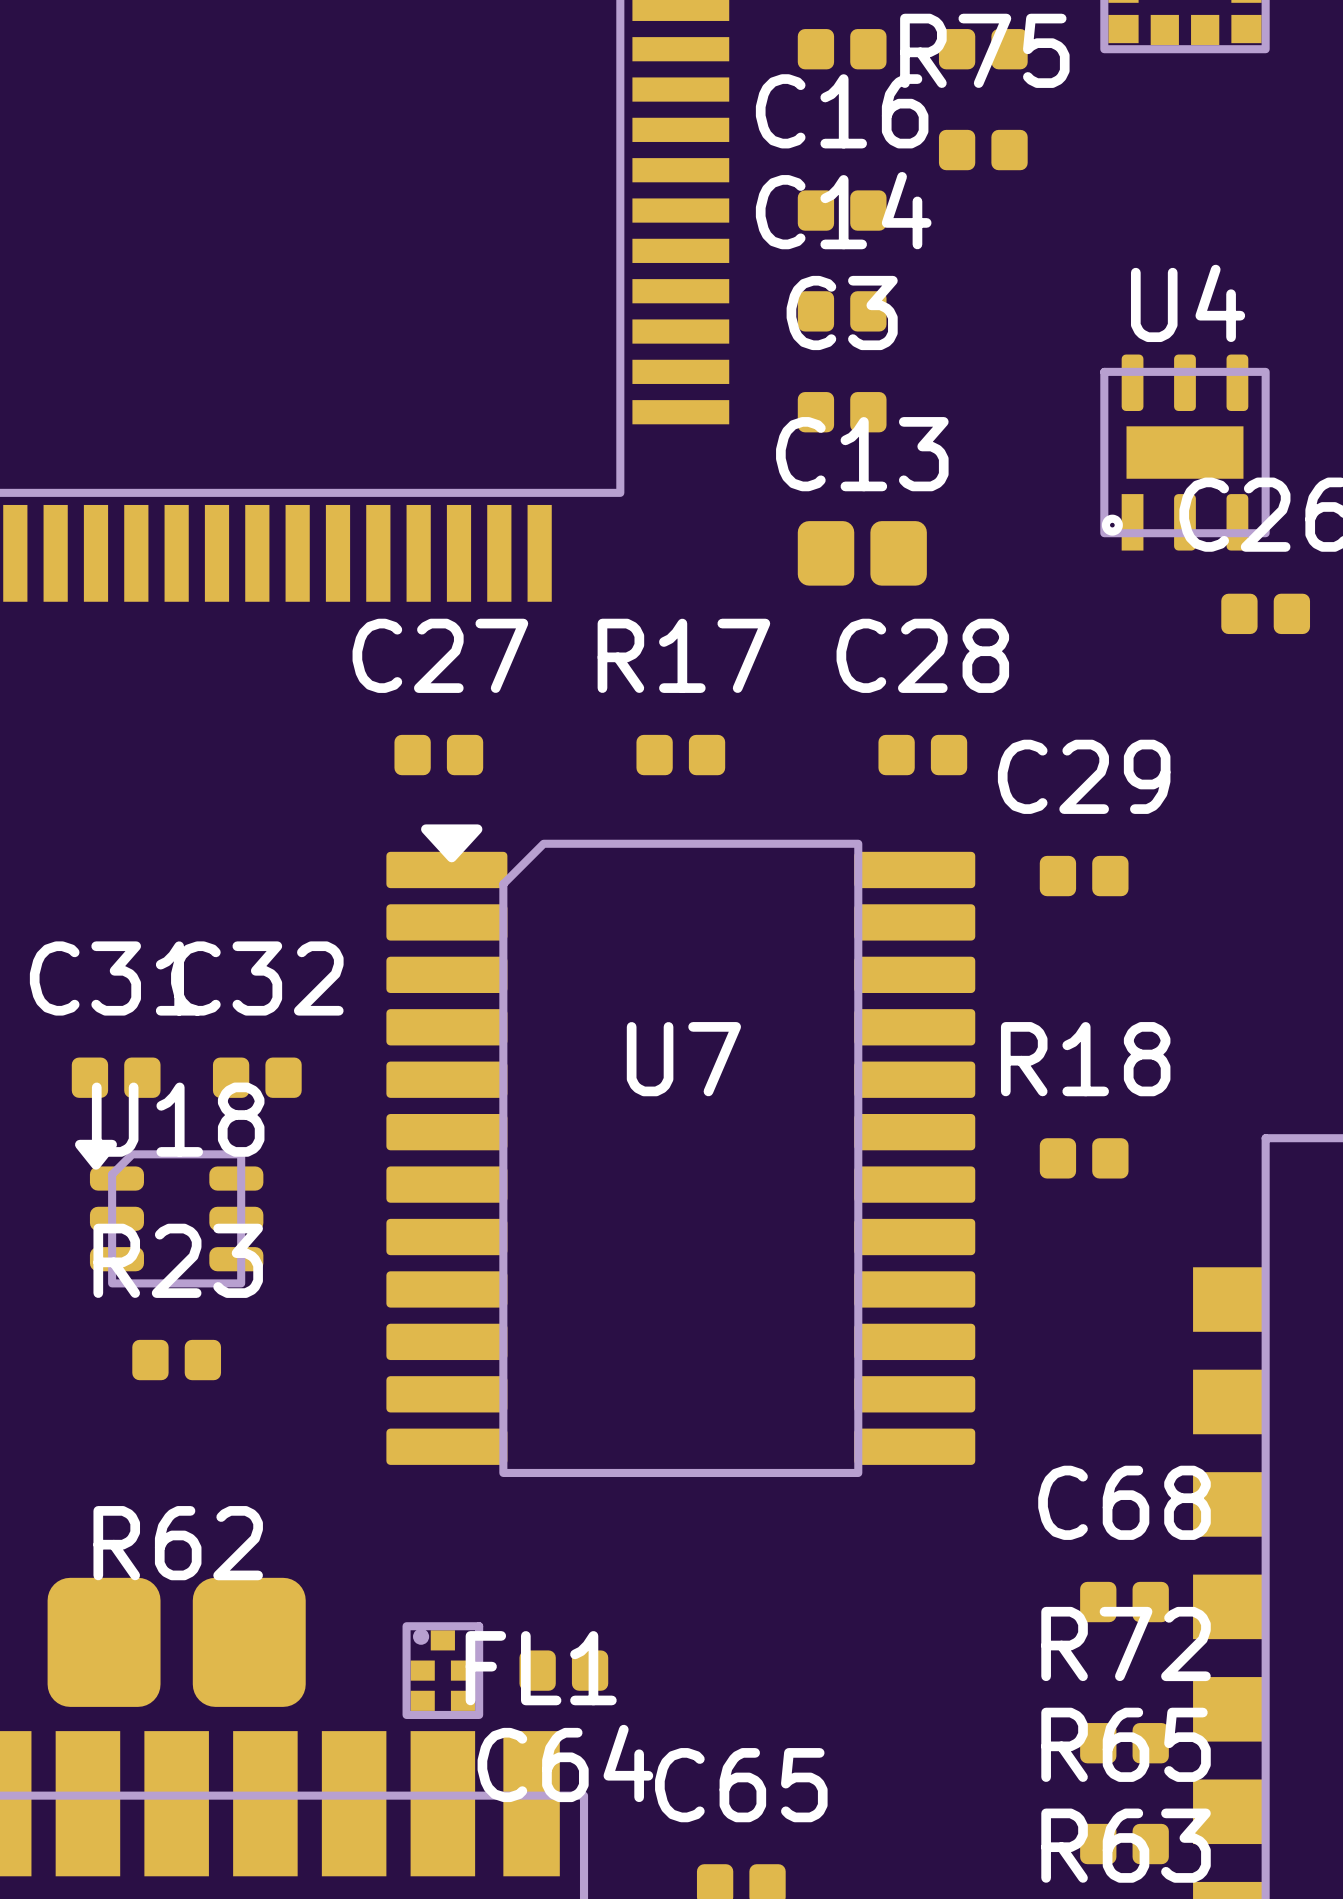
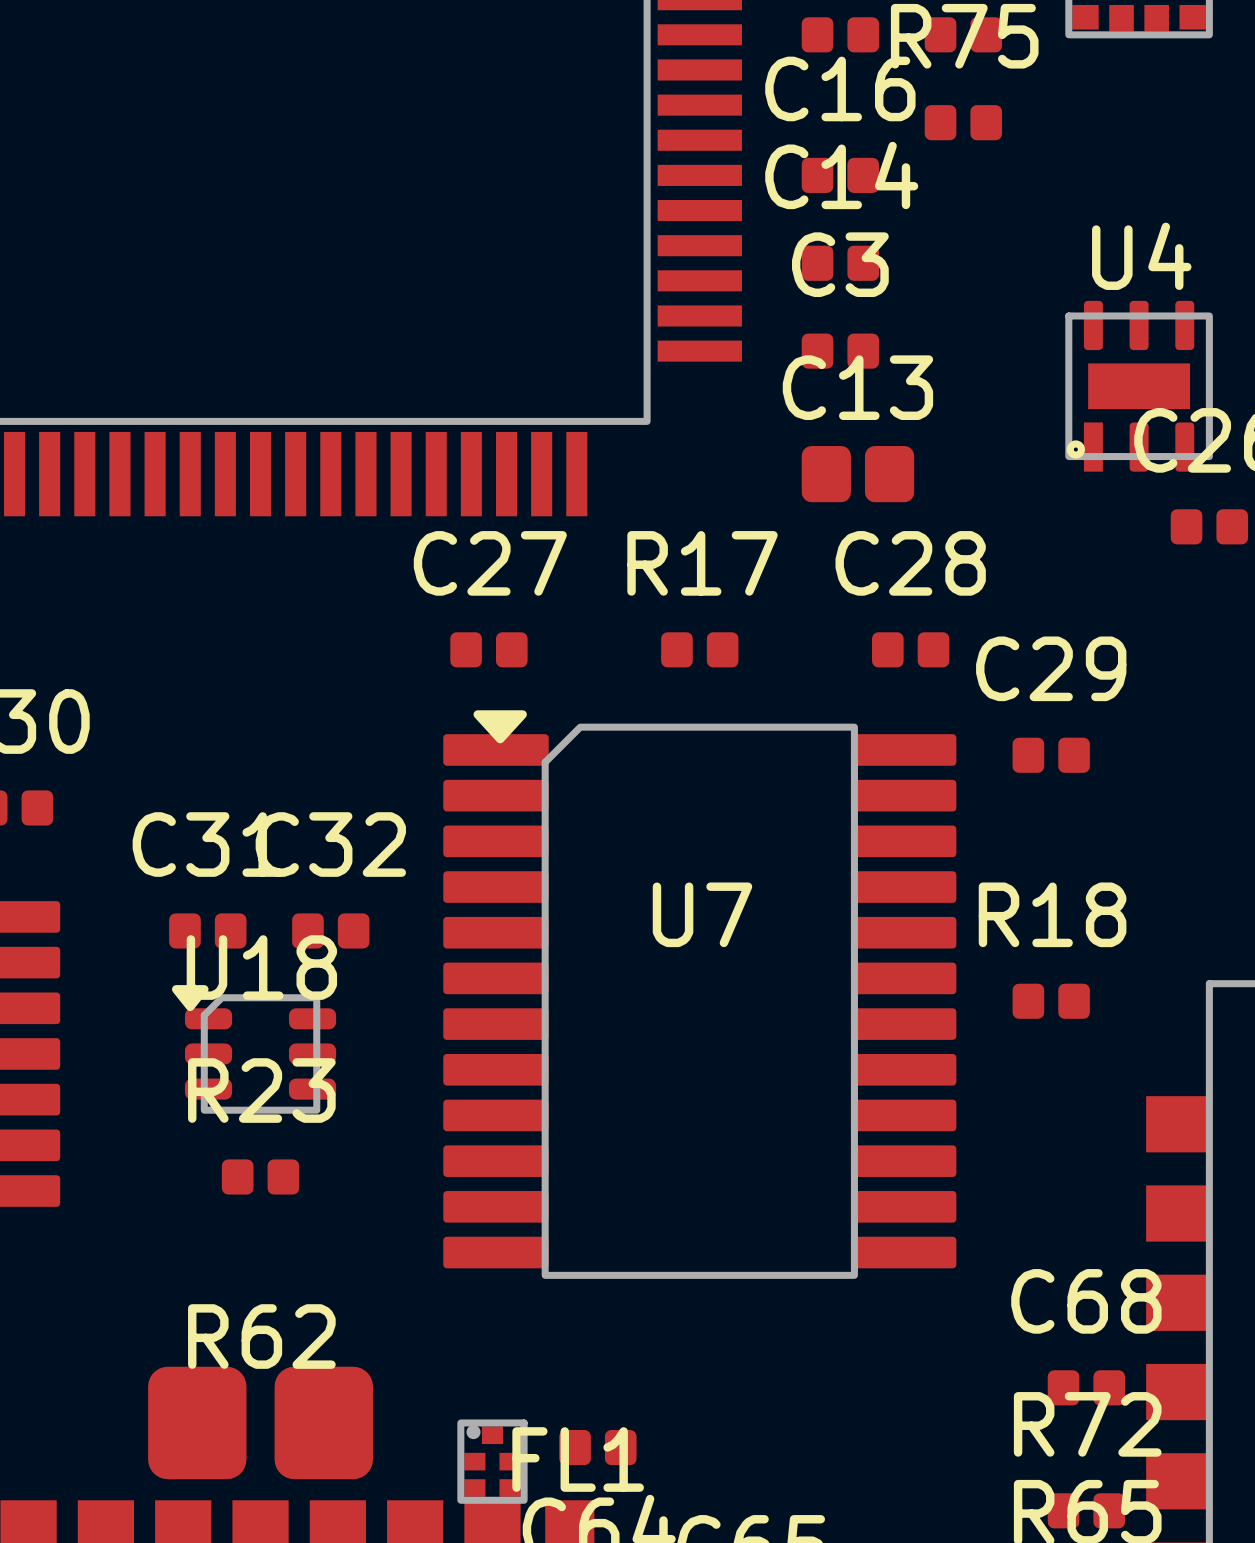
FL1 position: (442, 1670) -> (492, 1461)

